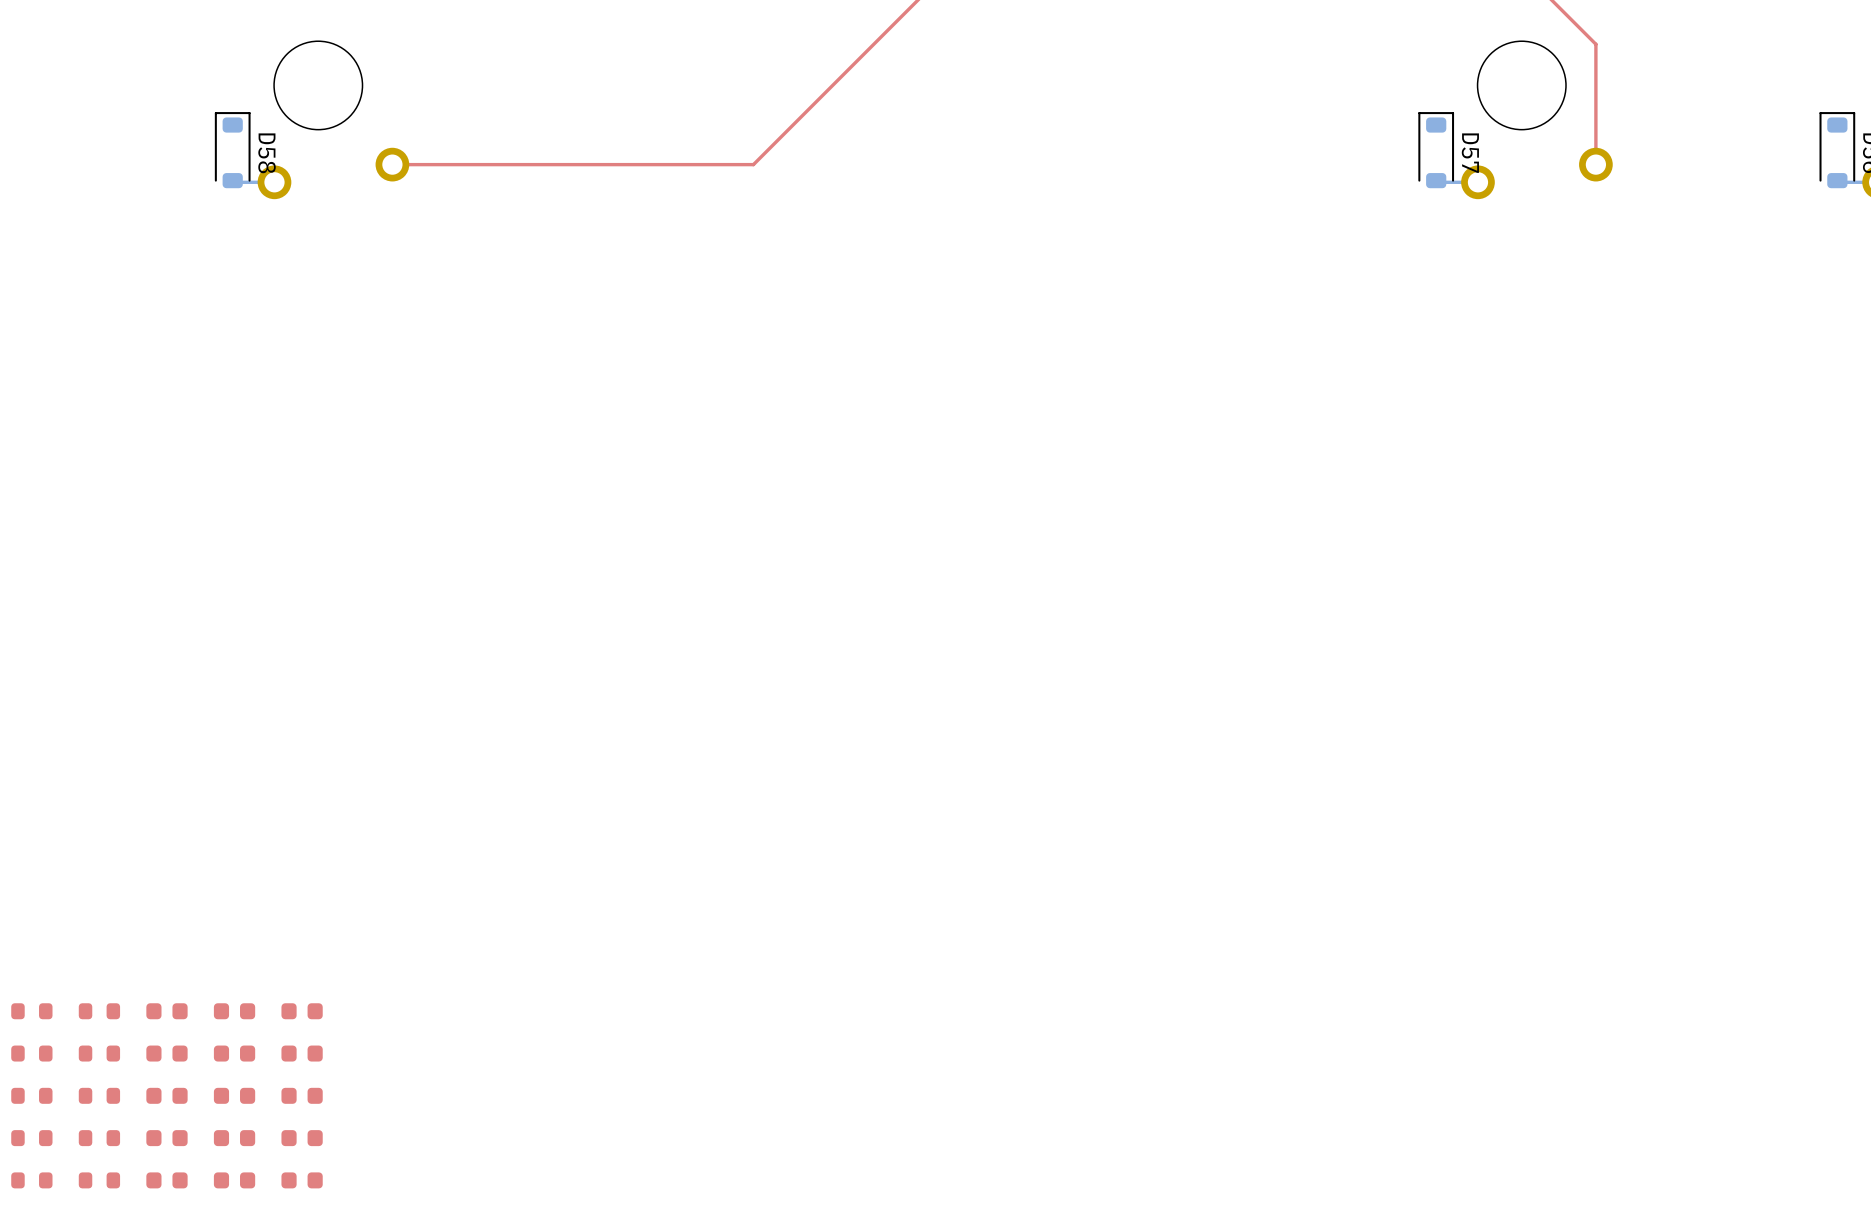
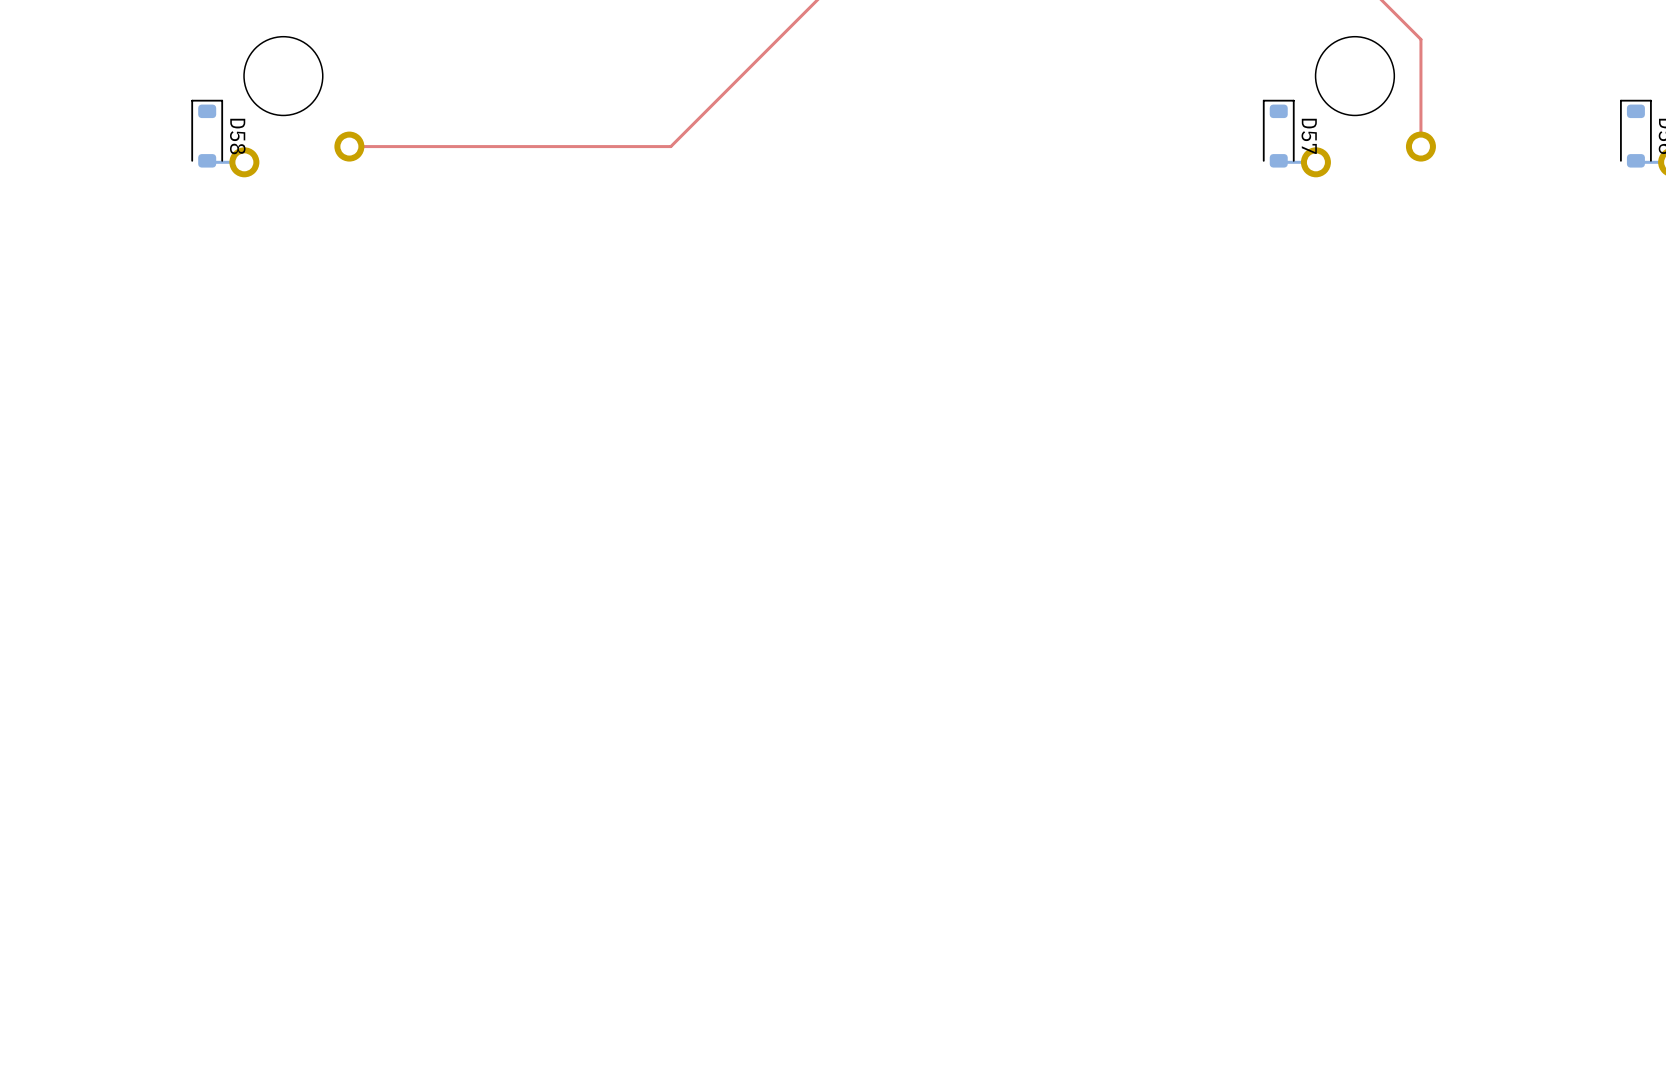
part: (31, 1011) -> none
part: (99, 1011) -> none
part: (166, 1011) -> none
part: (234, 1011) -> none
part: (302, 1011) -> none
part: (31, 1053) -> none
part: (99, 1053) -> none
part: (166, 1053) -> none
part: (234, 1053) -> none
part: (302, 1053) -> none
part: (31, 1095) -> none
part: (99, 1095) -> none
part: (166, 1095) -> none
part: (234, 1095) -> none
part: (302, 1095) -> none
part: (31, 1138) -> none
part: (99, 1138) -> none
part: (166, 1138) -> none
part: (234, 1138) -> none
part: (302, 1138) -> none
part: (31, 1180) -> none
part: (99, 1180) -> none
part: (166, 1180) -> none
part: (234, 1180) -> none
part: (302, 1180) -> none

